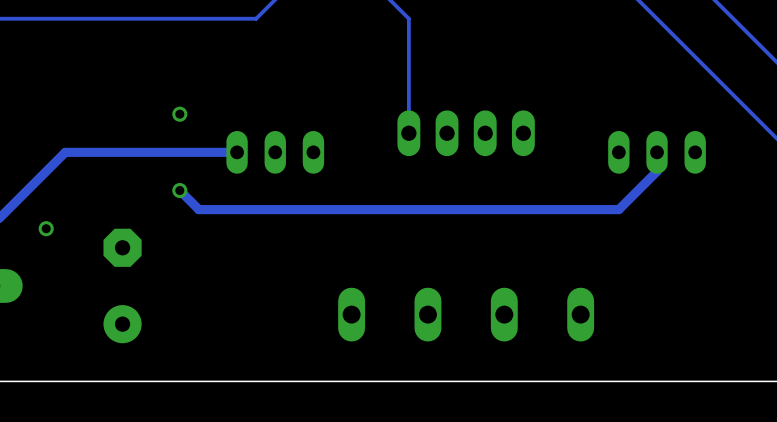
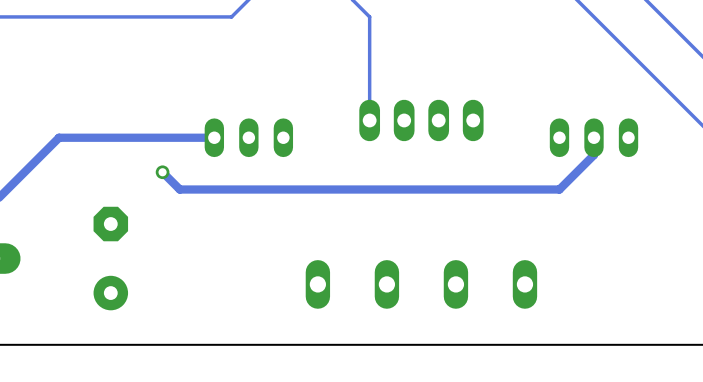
via: (179, 114) -> none
via: (46, 228) -> none

